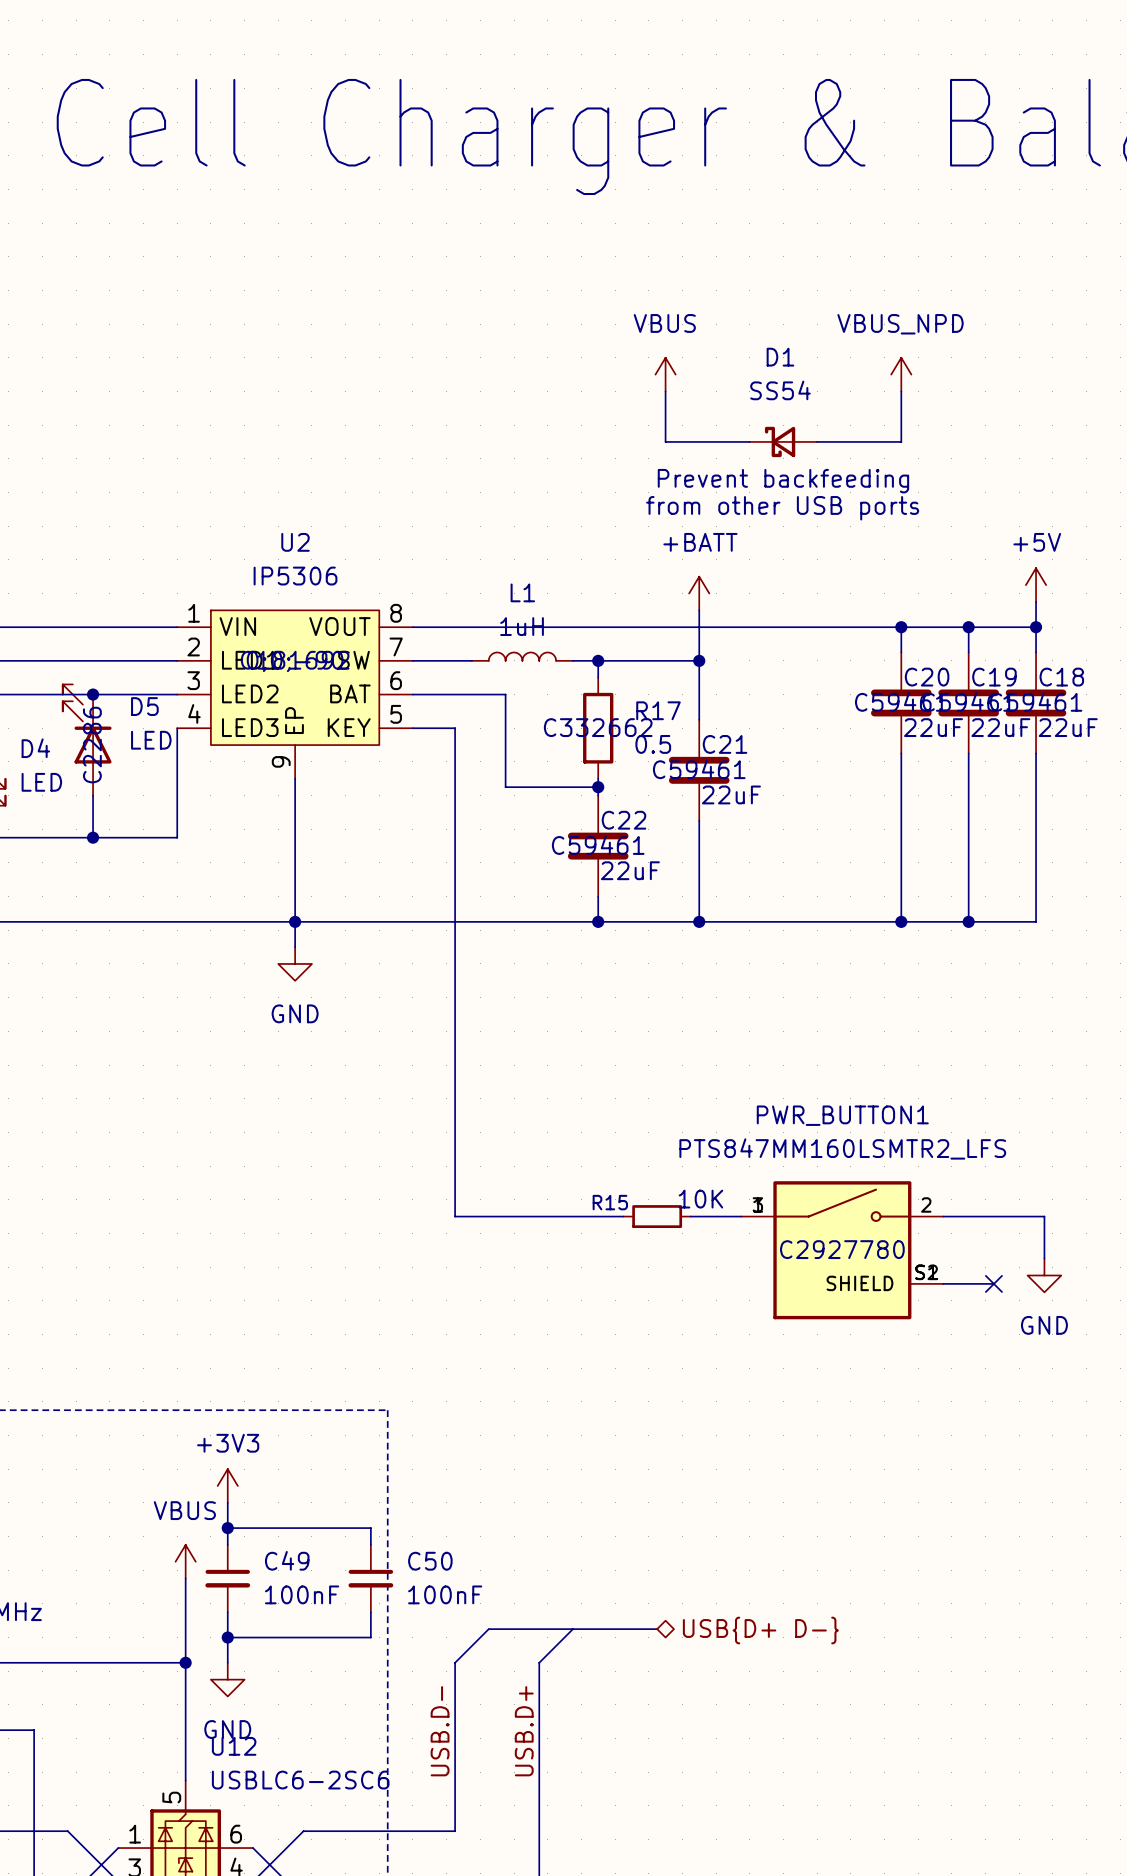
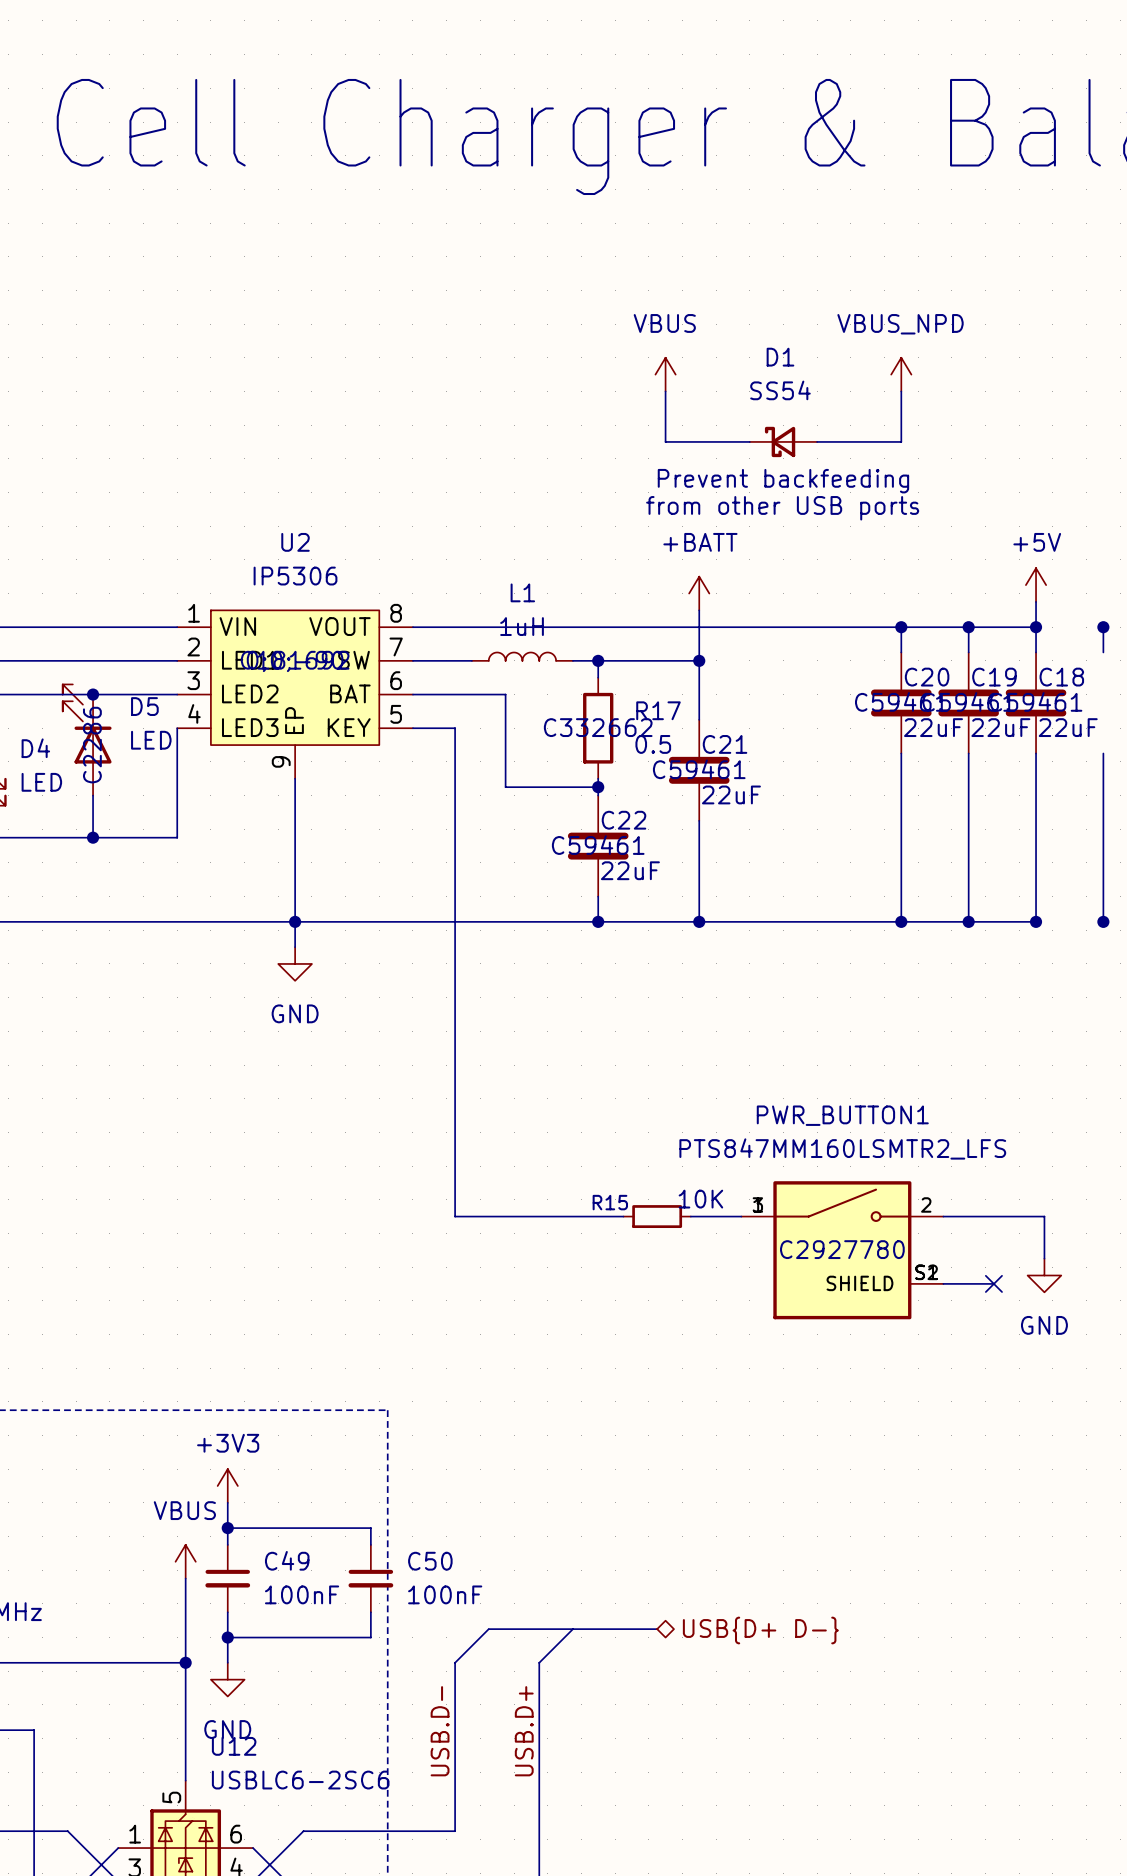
wire: none -> (1103, 627) (1103, 652)
junction: none -> (1103, 627)
wire: none -> (1103, 753) (1103, 921)
junction: none -> (1036, 921)
junction: none -> (1103, 921)

